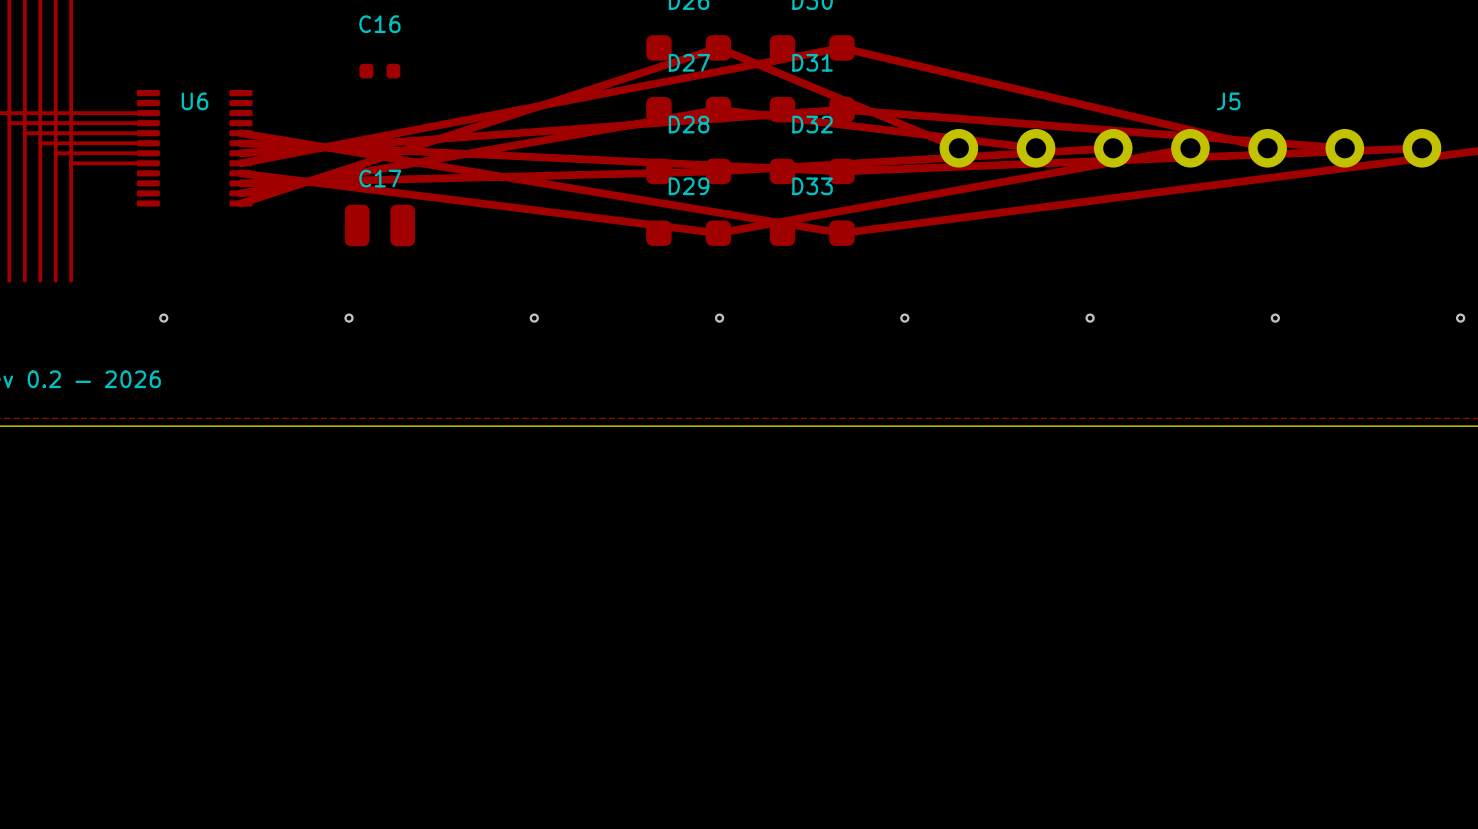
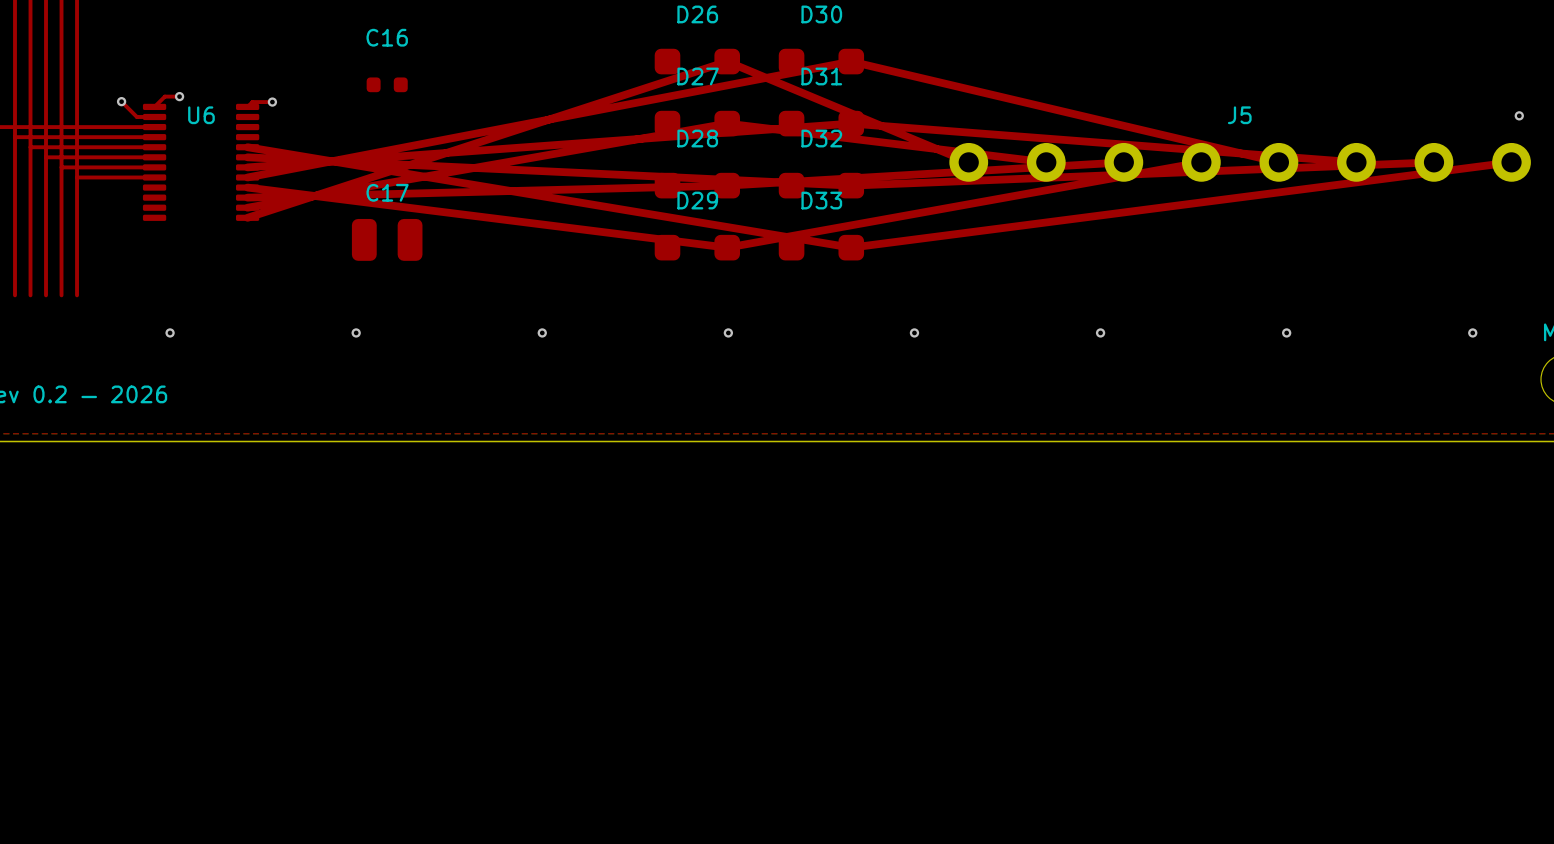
top track: none -> (179, 96) (164, 96) (154, 106)
via: none -> (179, 96)
top track: none -> (121, 101) (136, 117) (154, 117)
via: none -> (121, 101)
top track: none -> (272, 102) (252, 102) (247, 106)
via: none -> (272, 102)

